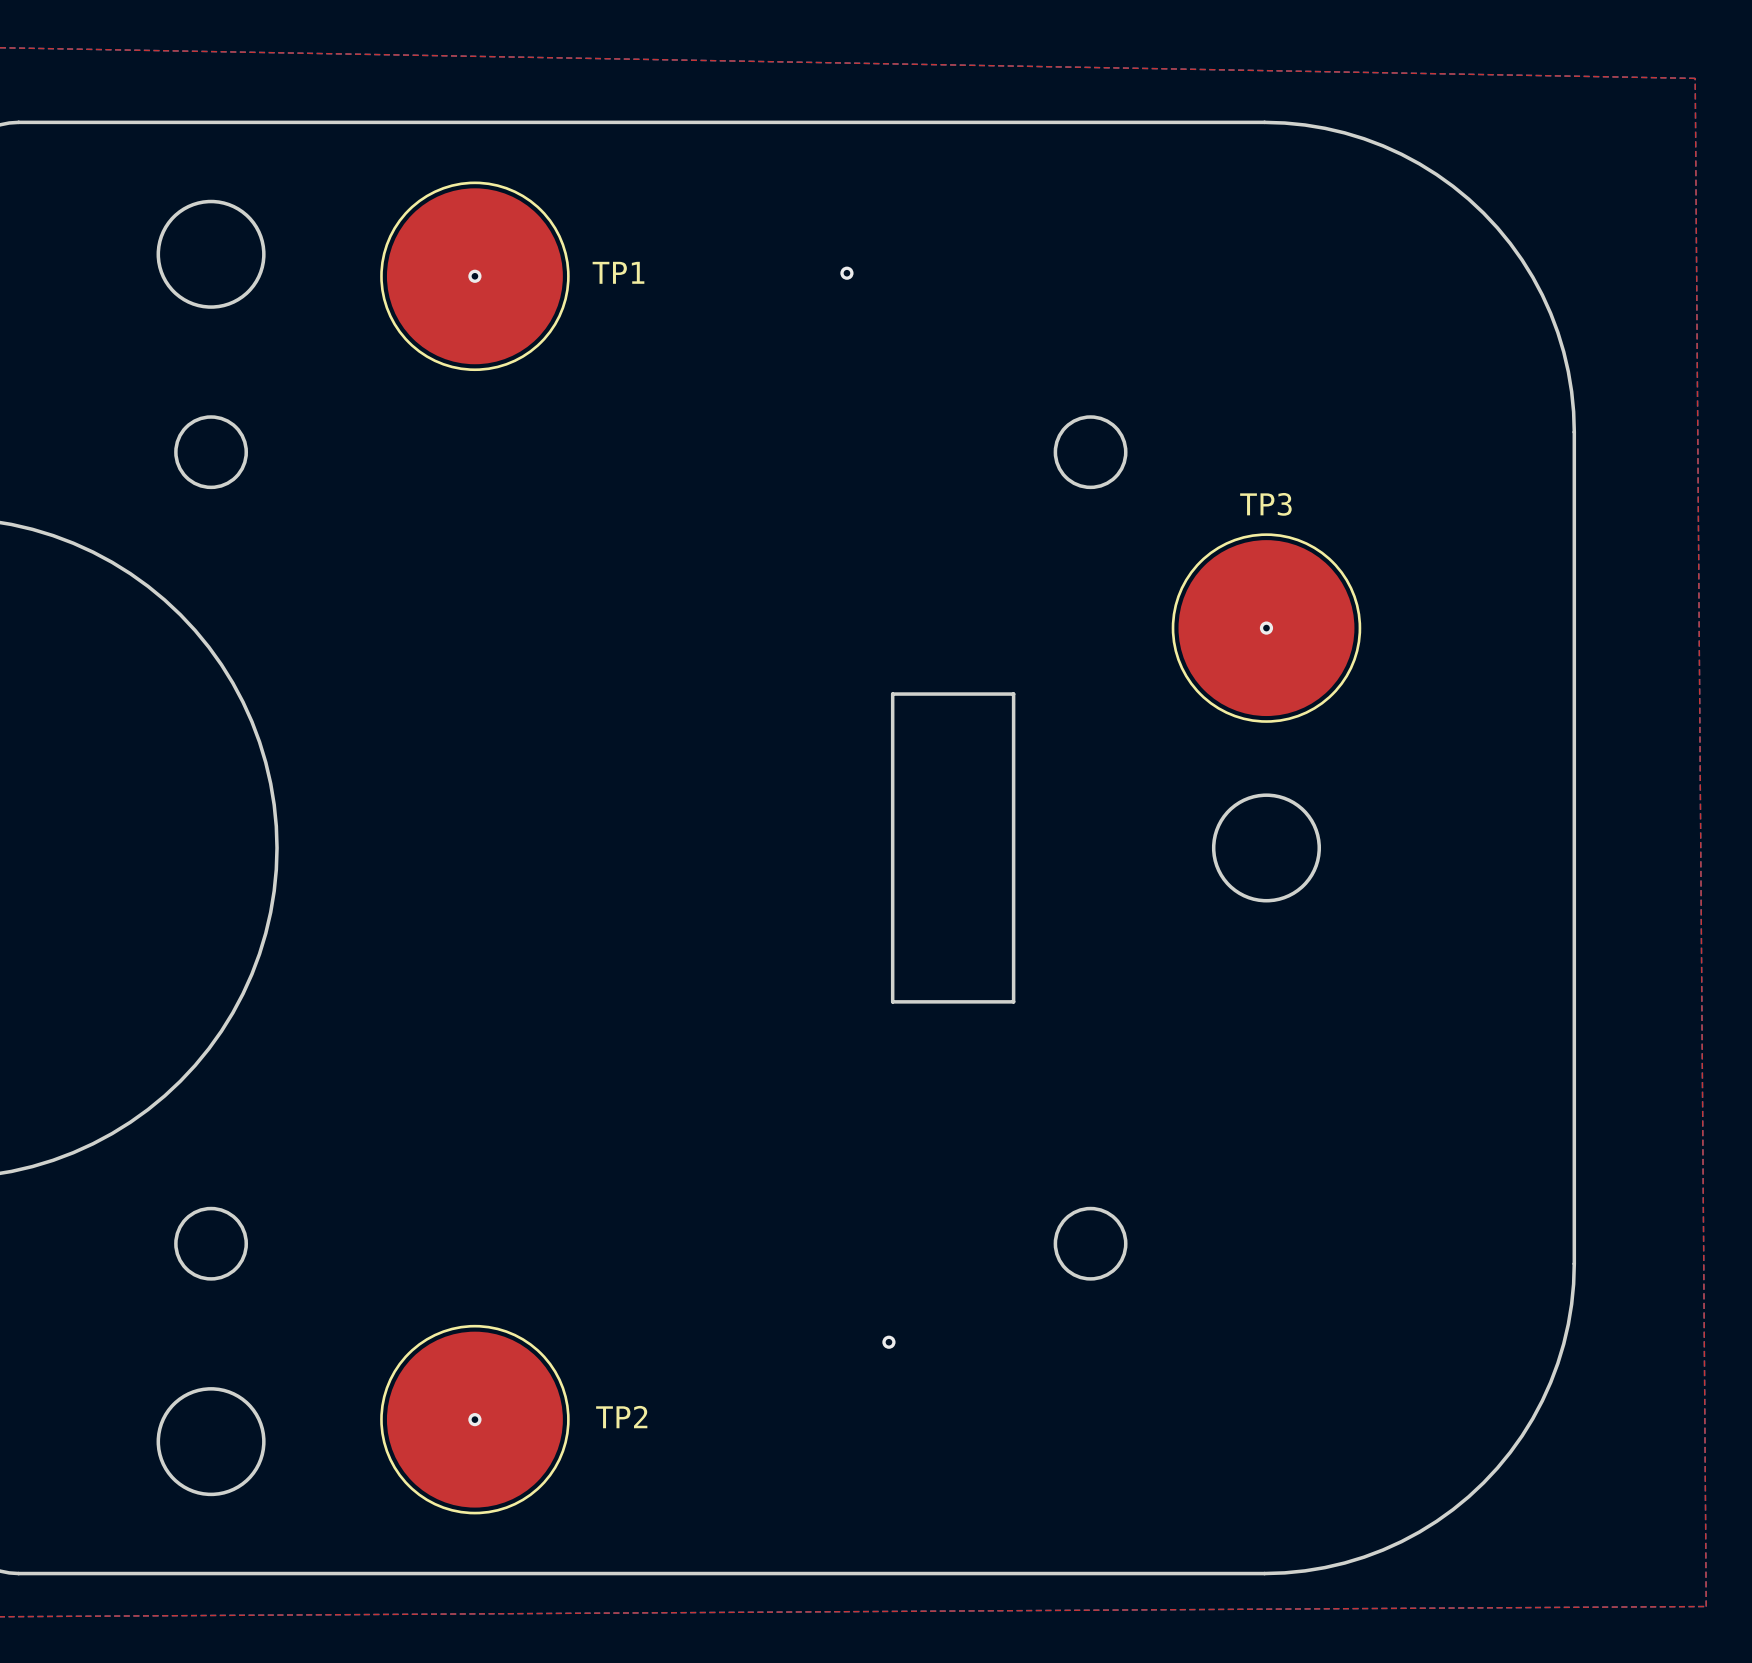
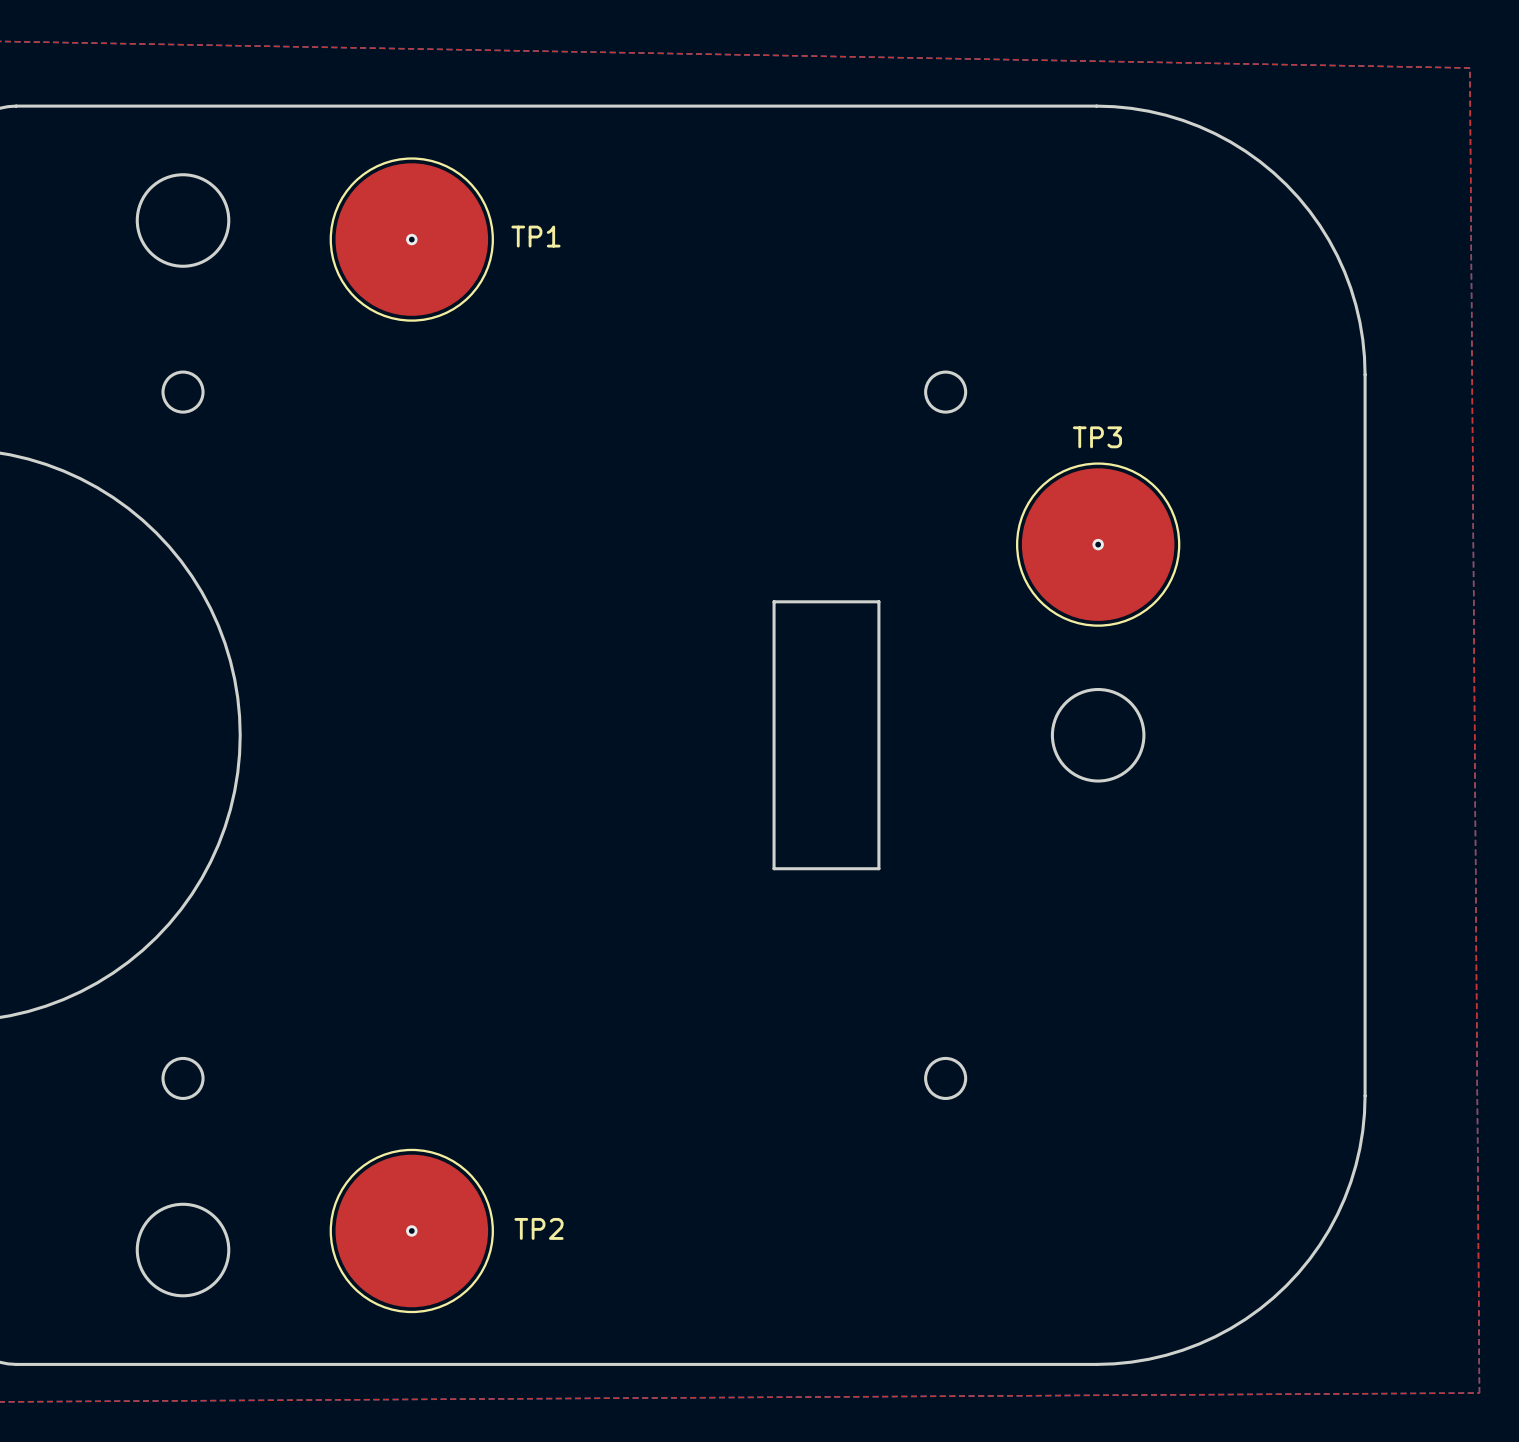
via: (846, 273) -> none
round board edge size: [174, 415, 249, 490] -> [161, 370, 205, 414]
round board edge size: [1053, 415, 1128, 490] -> [924, 370, 968, 414]
round board edge size: [174, 1206, 249, 1281] -> [161, 1056, 205, 1100]
round board edge size: [1053, 1206, 1128, 1281] -> [924, 1056, 968, 1100]
via: (888, 1342) -> none

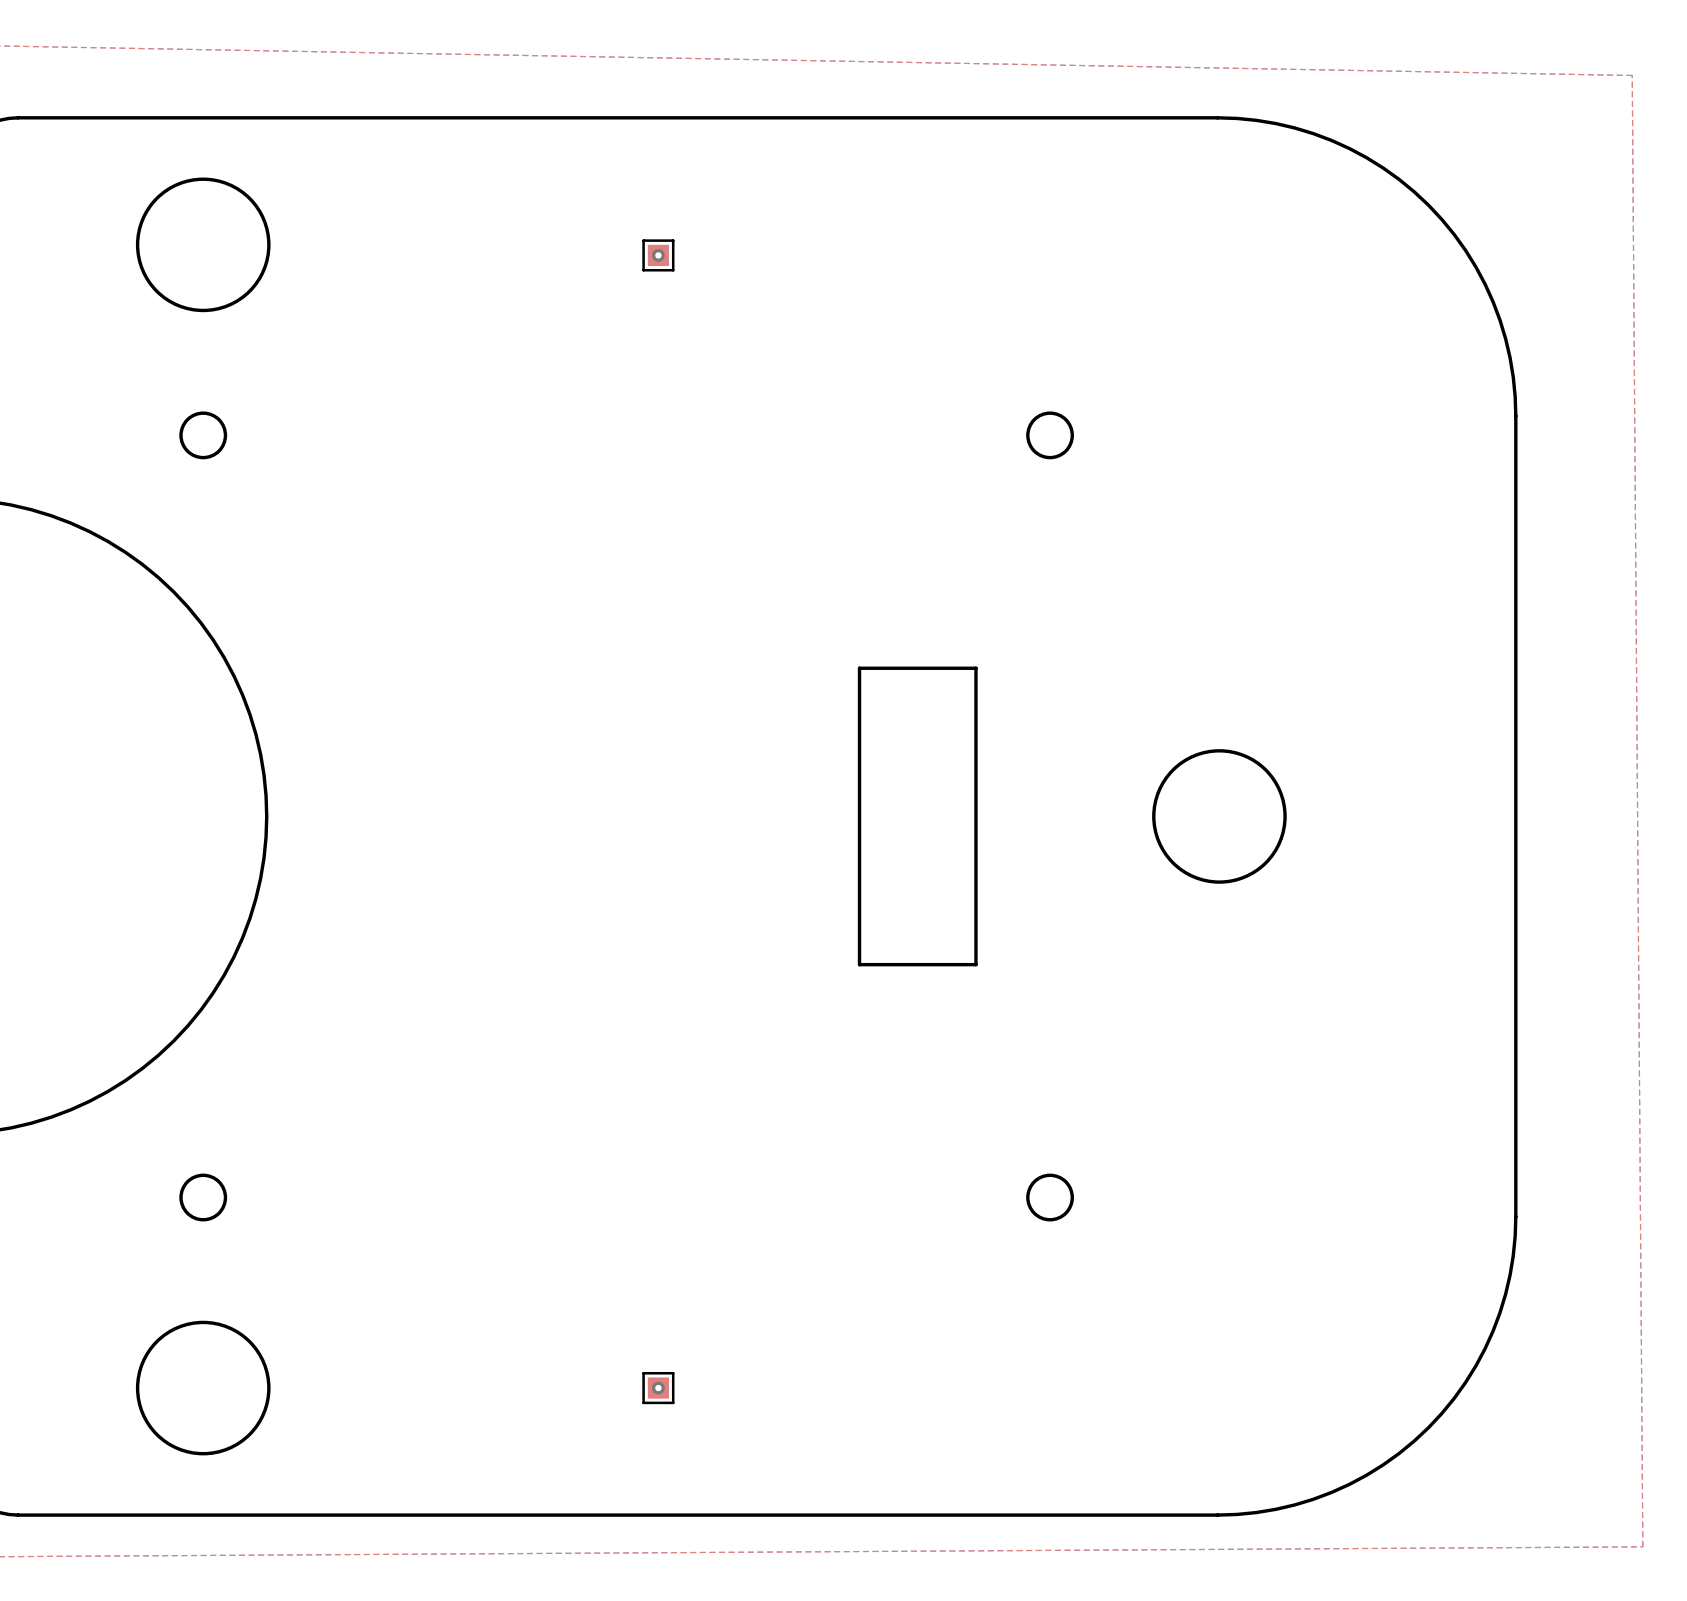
round board edge size: [135, 173, 231, 268] -> [135, 177, 271, 313]
part: none -> (658, 255)
via: none -> (658, 255)
TP1: (411, 239) -> none
via: (411, 239) -> none
TP3: (1098, 544) -> none
via: (1098, 544) -> none
round board edge size: [1050, 687, 1146, 783] -> [1152, 749, 1287, 884]
round board edge size: [135, 1202, 231, 1298] -> [135, 1320, 271, 1456]
TP2: (411, 1230) -> none
via: (411, 1230) -> none
part: none -> (658, 1388)
via: none -> (658, 1388)

